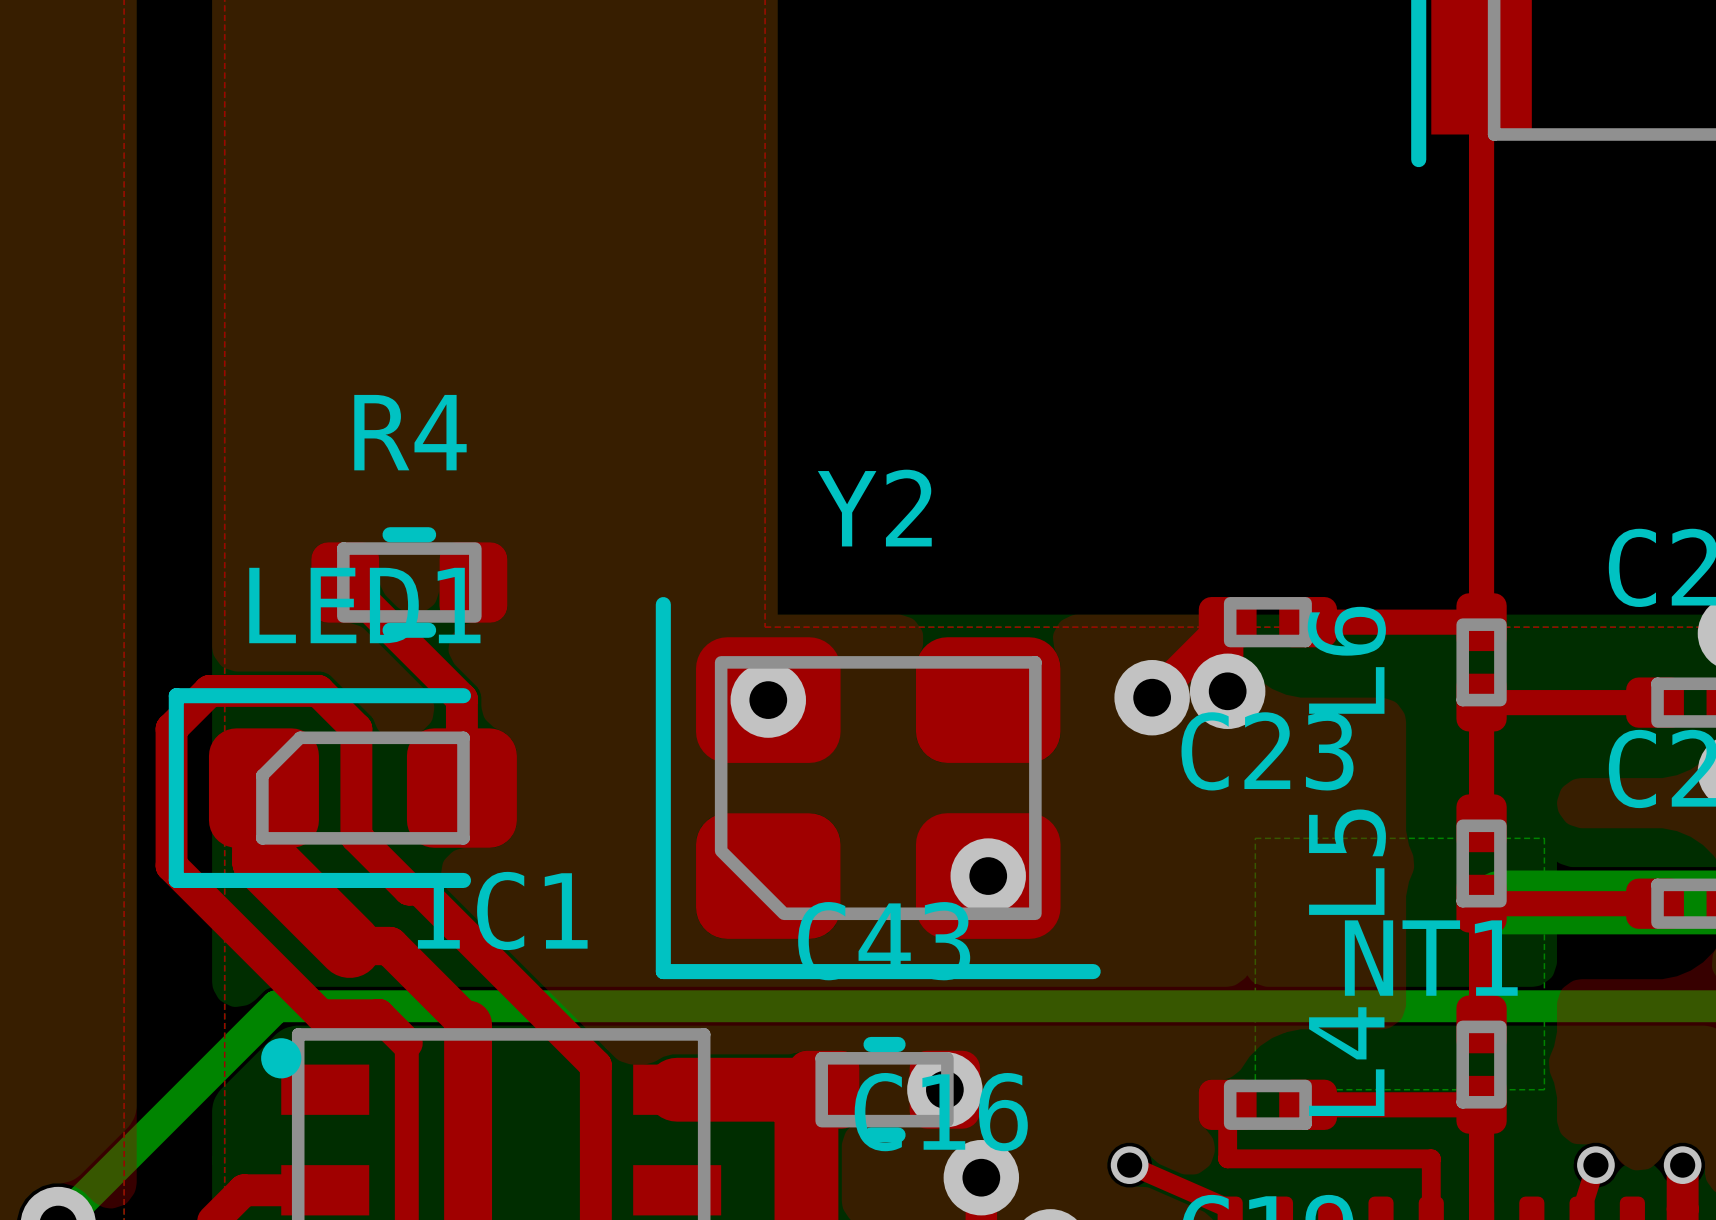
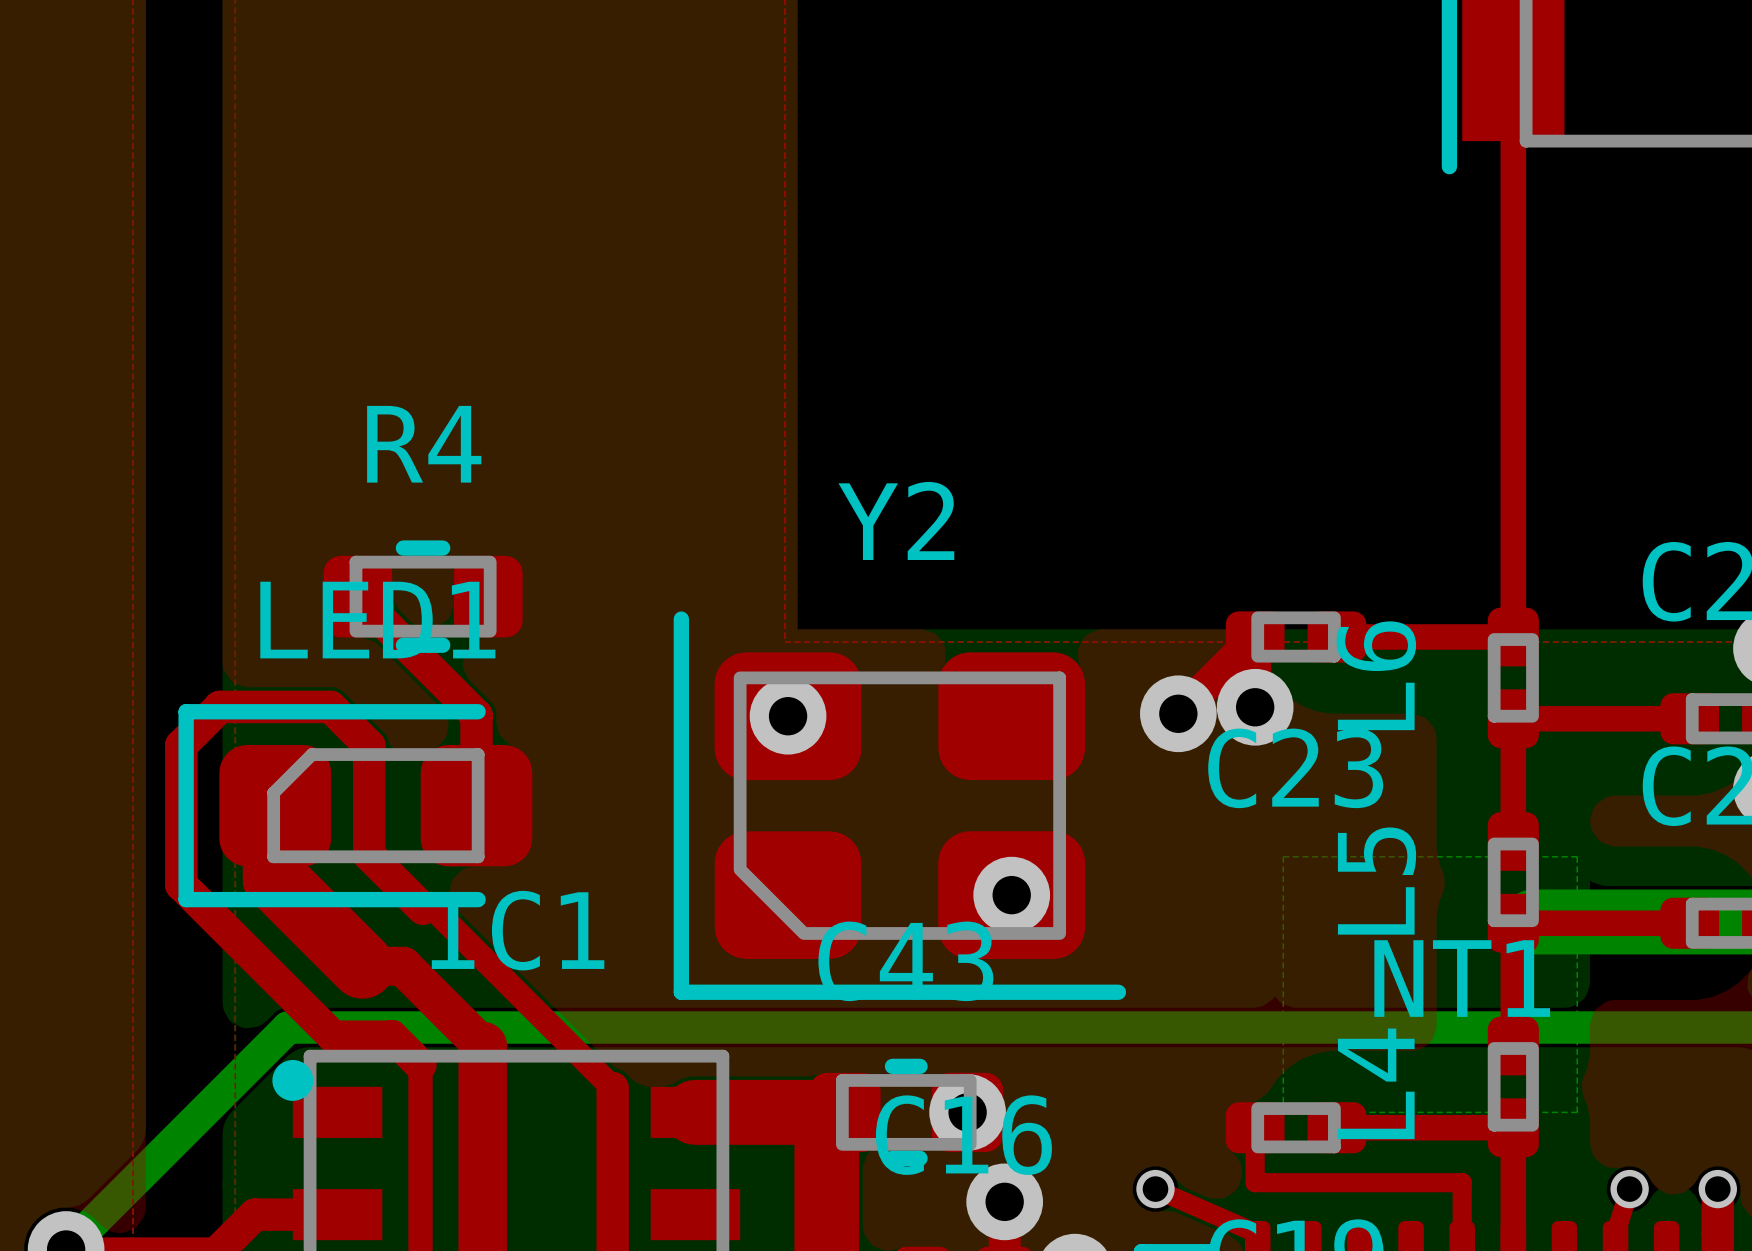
top track width: thick (409, 889) (419, 889) (595, 1065) -> thin (422, 908) (433, 908) (612, 1087)

